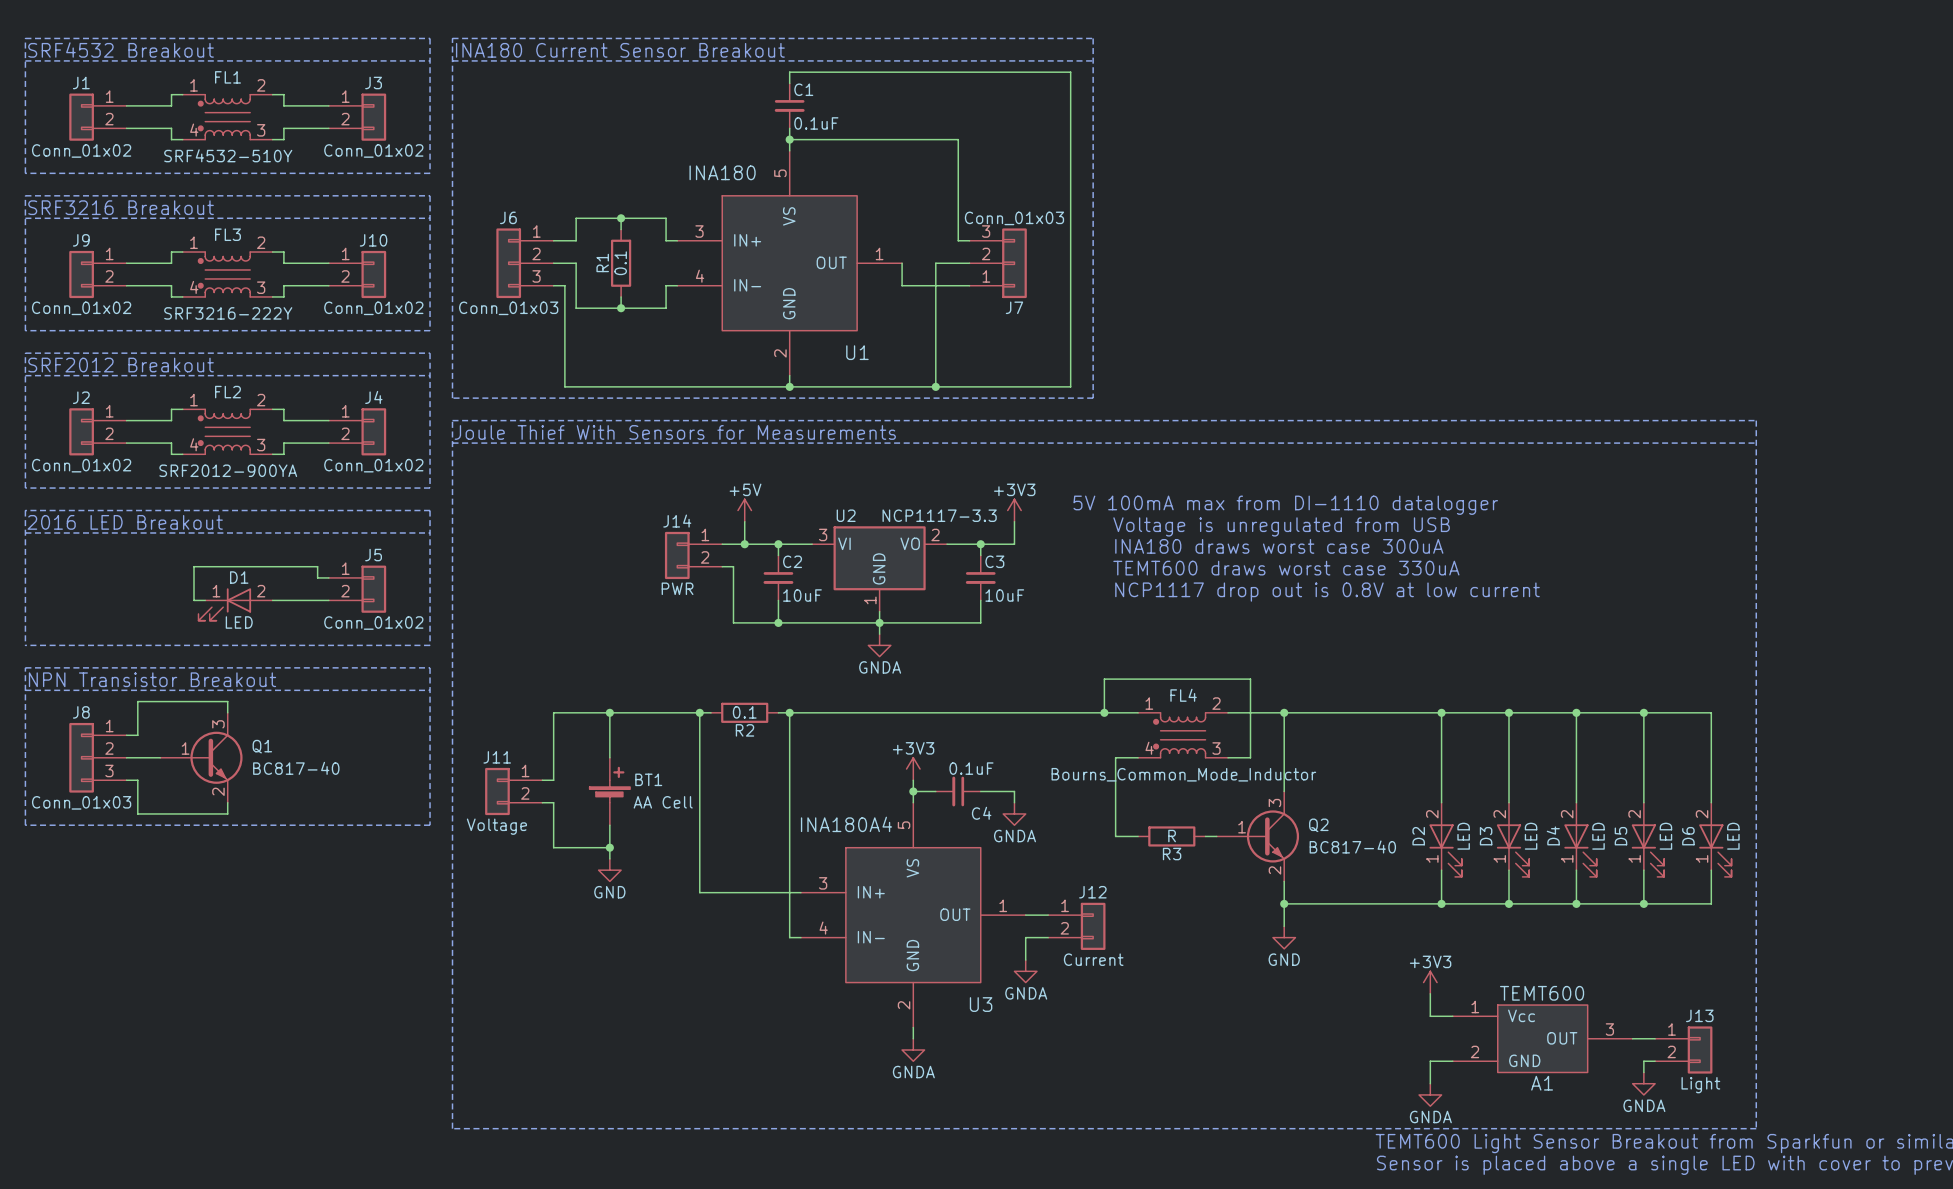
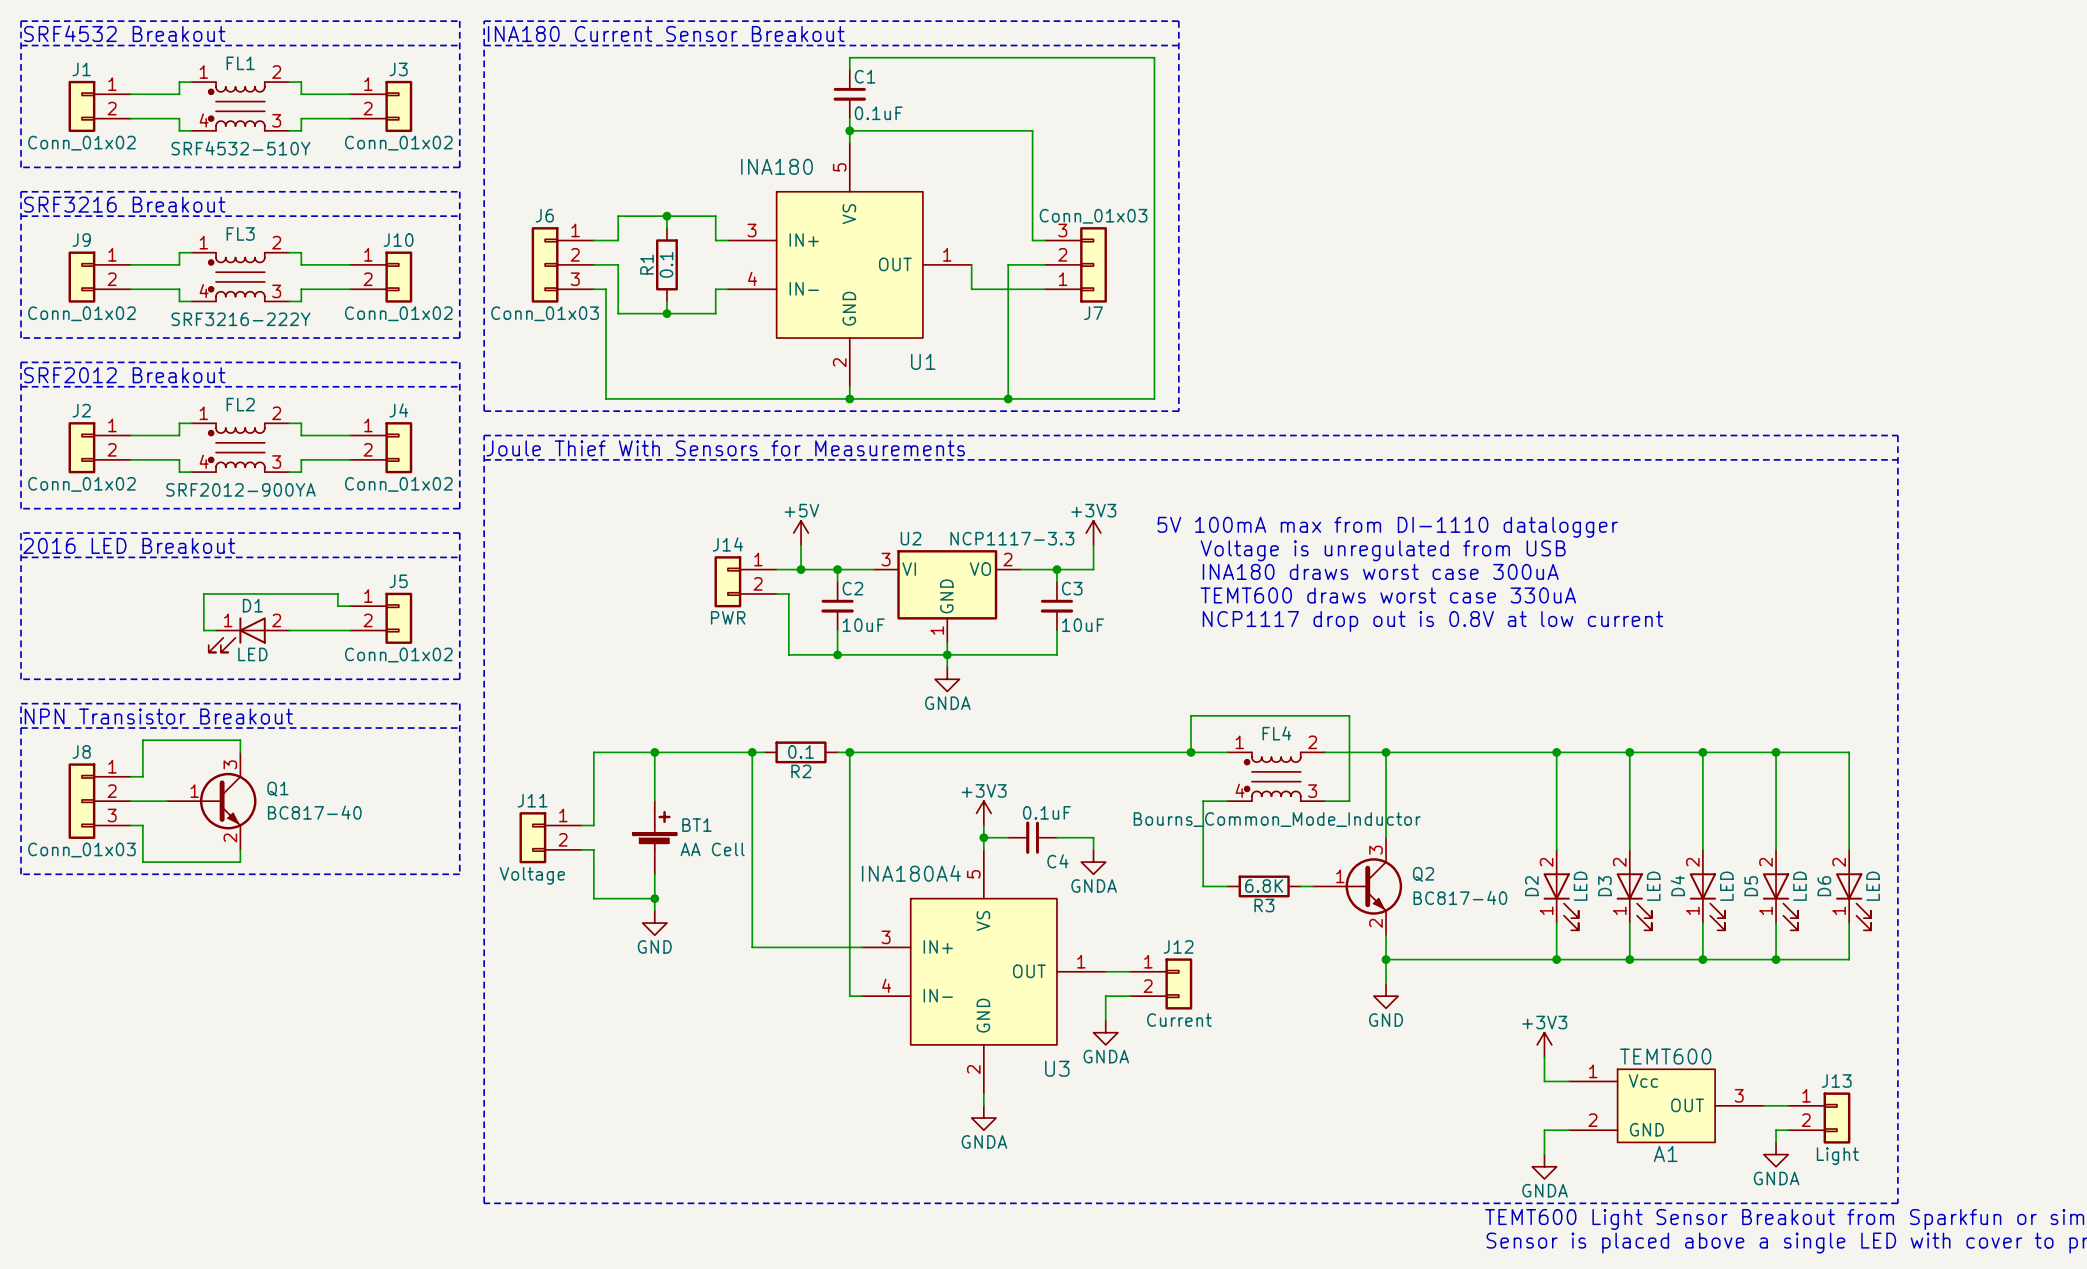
R3 value: R (1172, 836) -> 6.8K (1264, 886)

